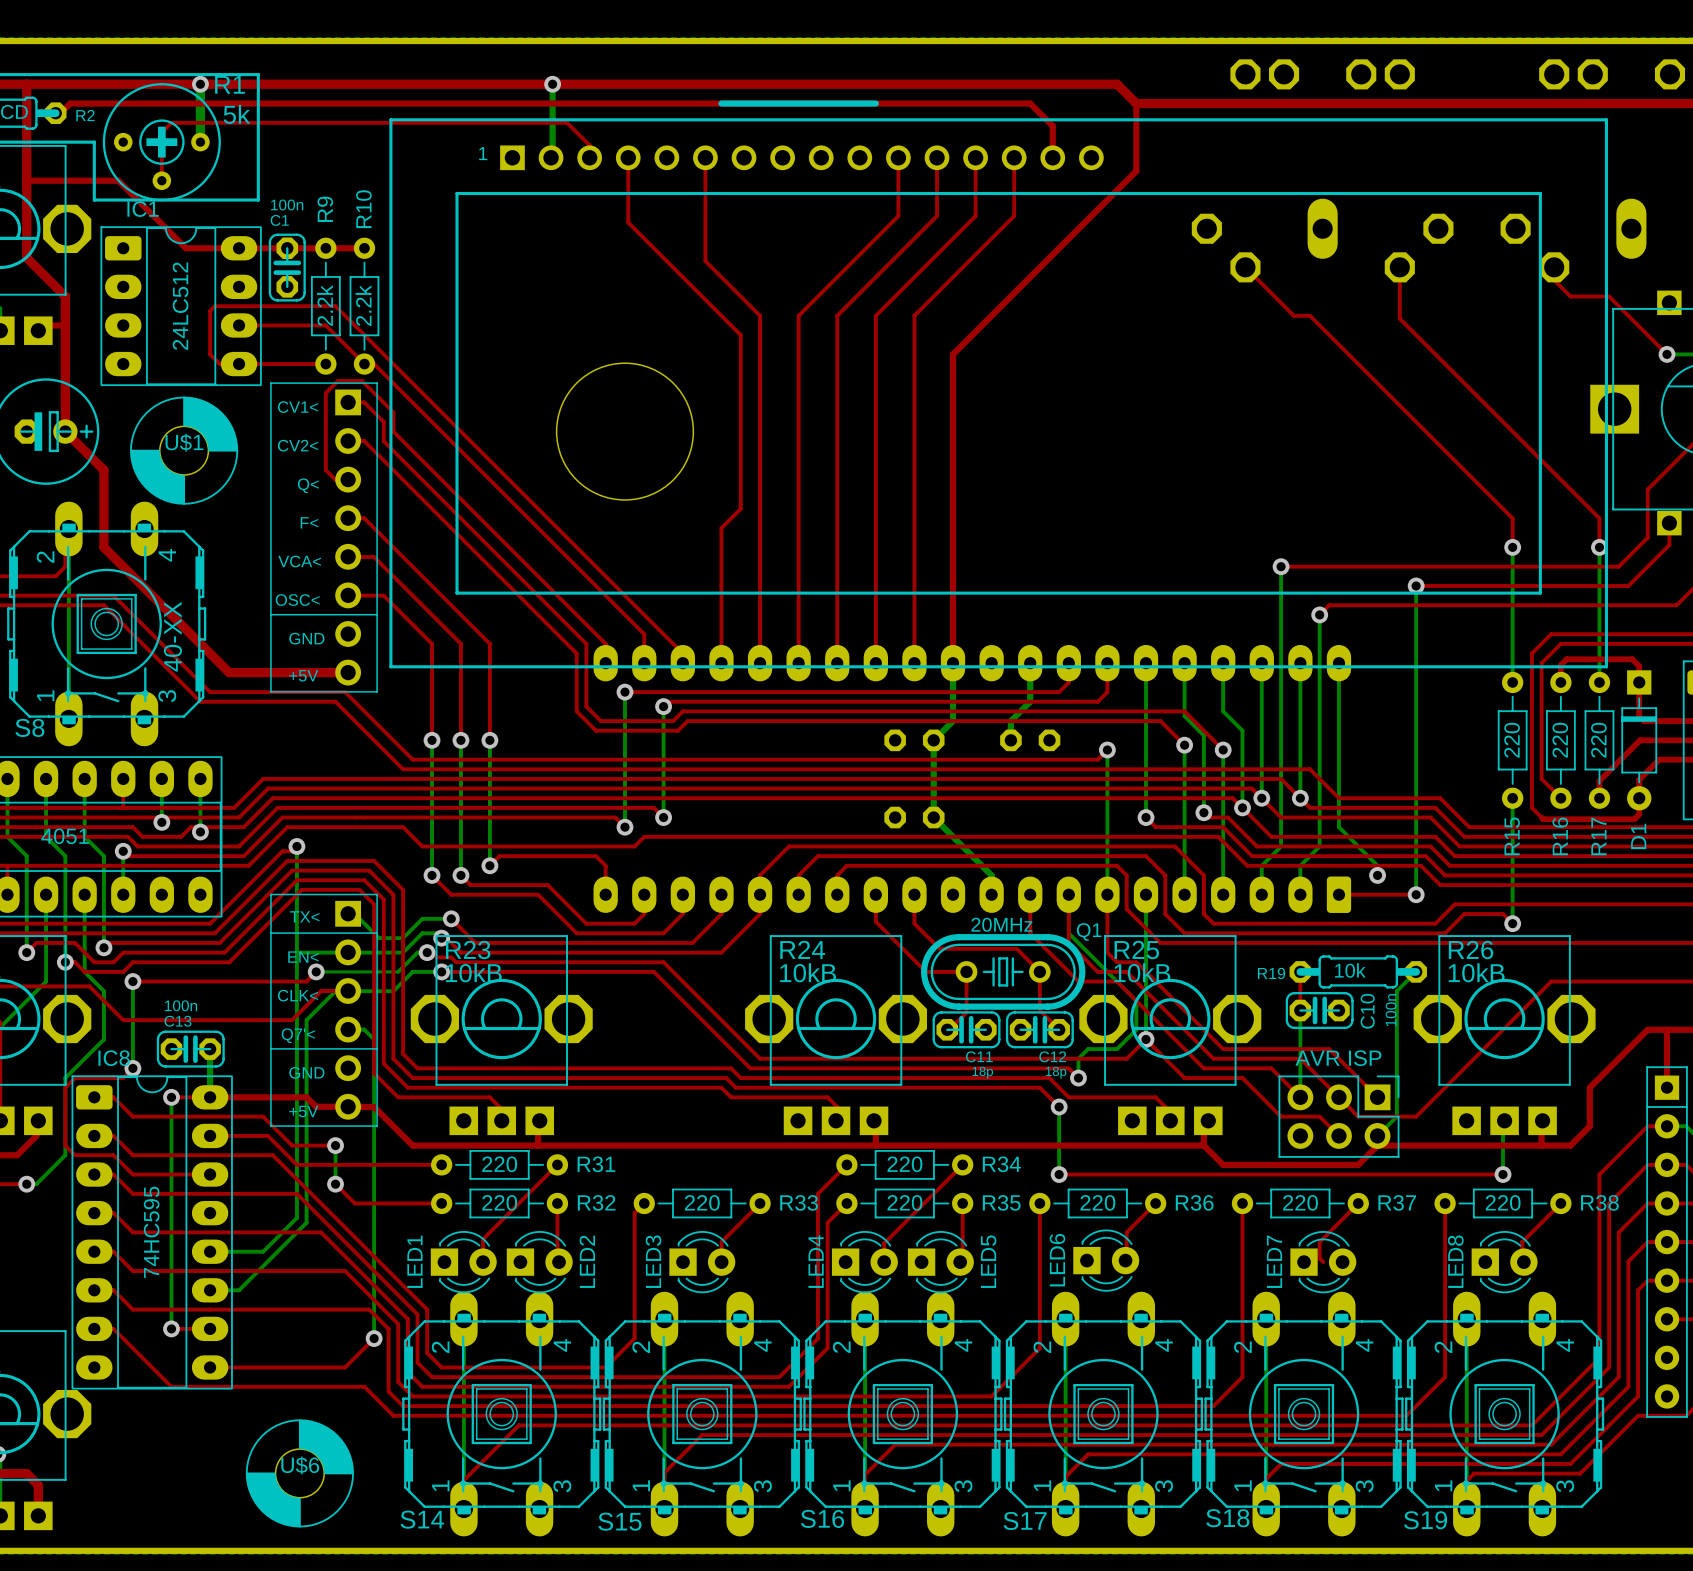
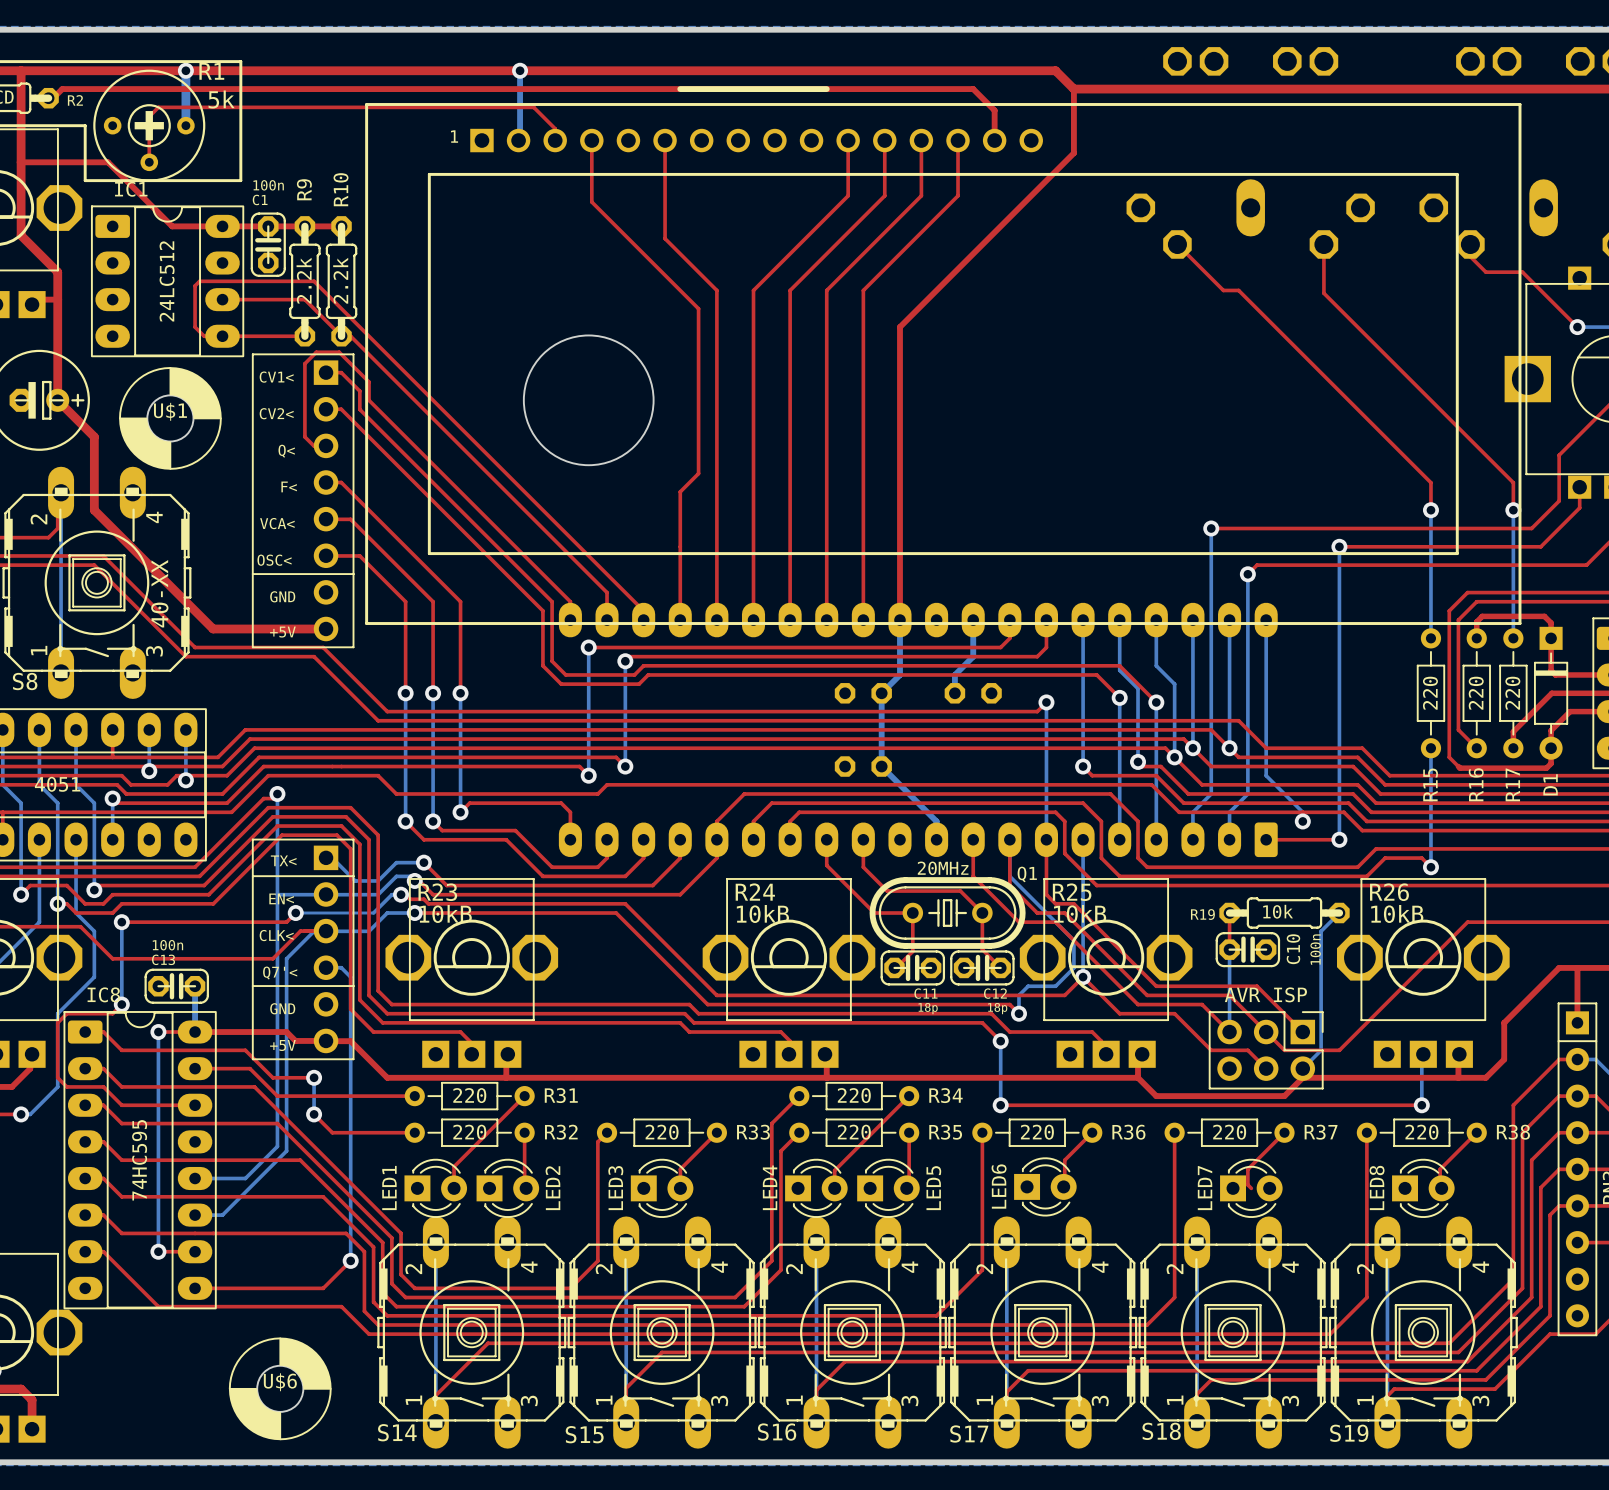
R9 footprint: [310, 237, 341, 375] -> [289, 216, 321, 347]
R10 footprint: [349, 237, 380, 375] -> [325, 216, 358, 347]

